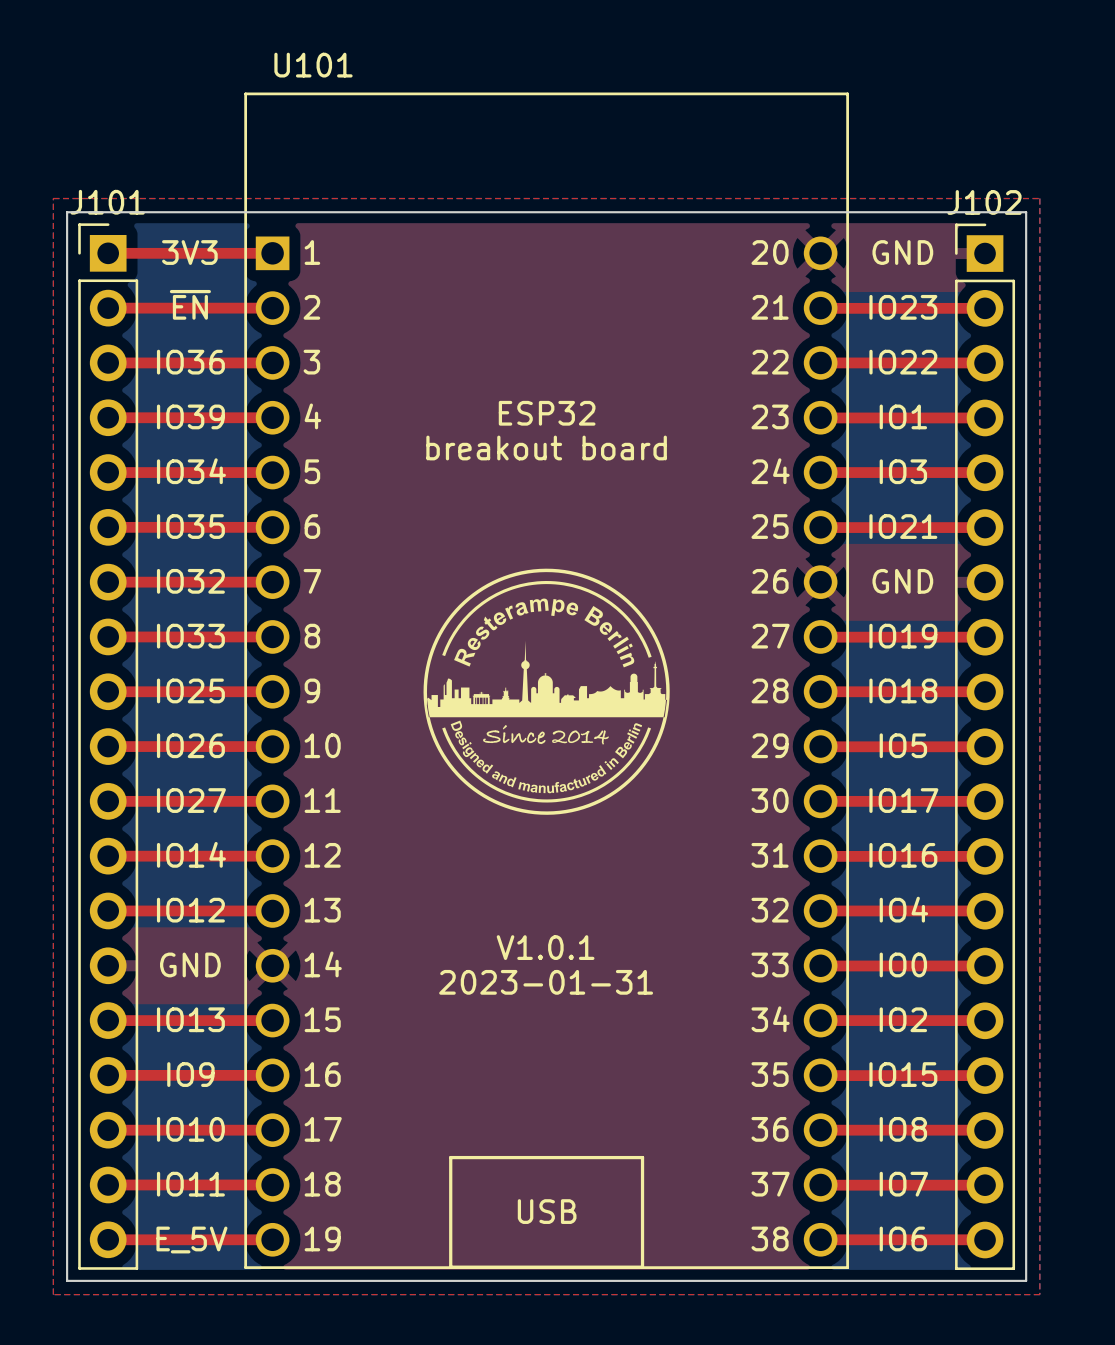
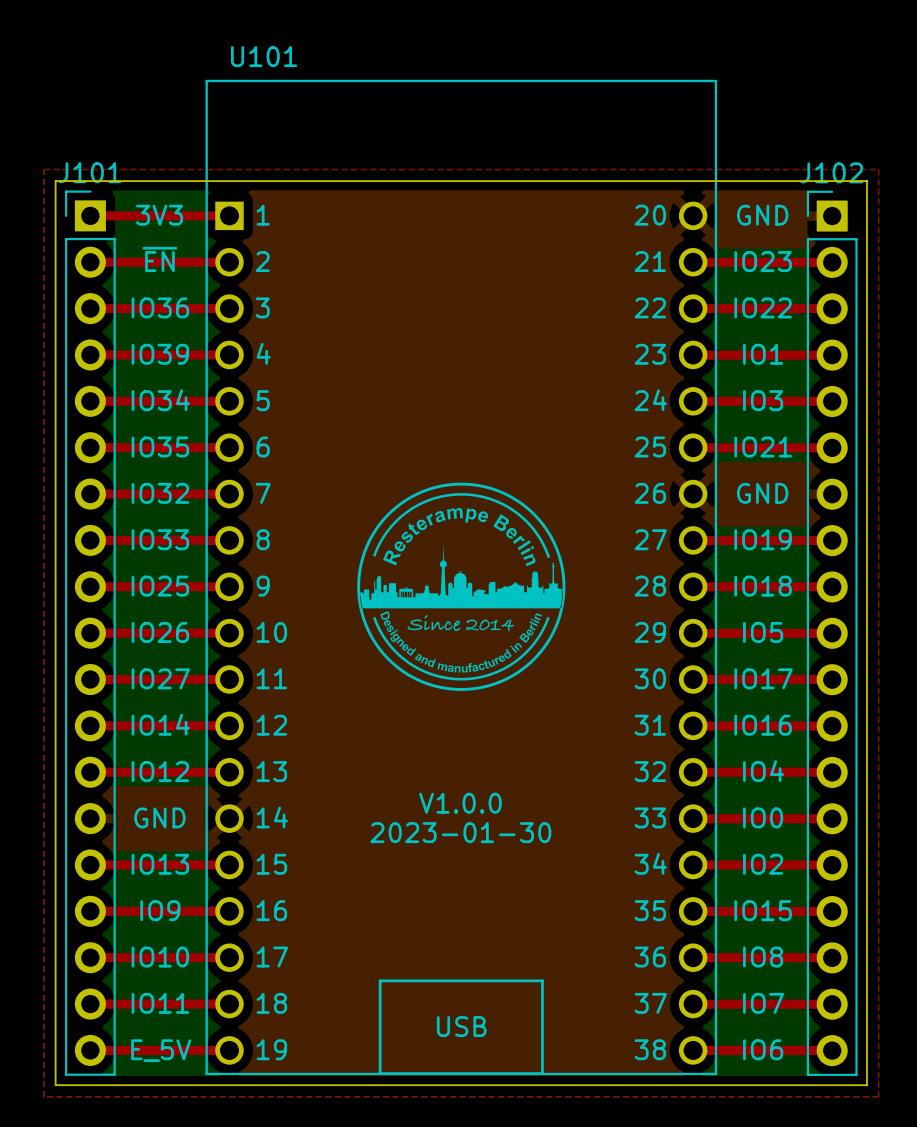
text: ESP32 (547, 413) -> none
text: breakout board (546, 448) -> none
text: V1.0.1 (545, 947) -> V1.0.0 (460, 803)
text: 2023-01-31 (546, 982) -> 2023-01-30 (460, 832)

